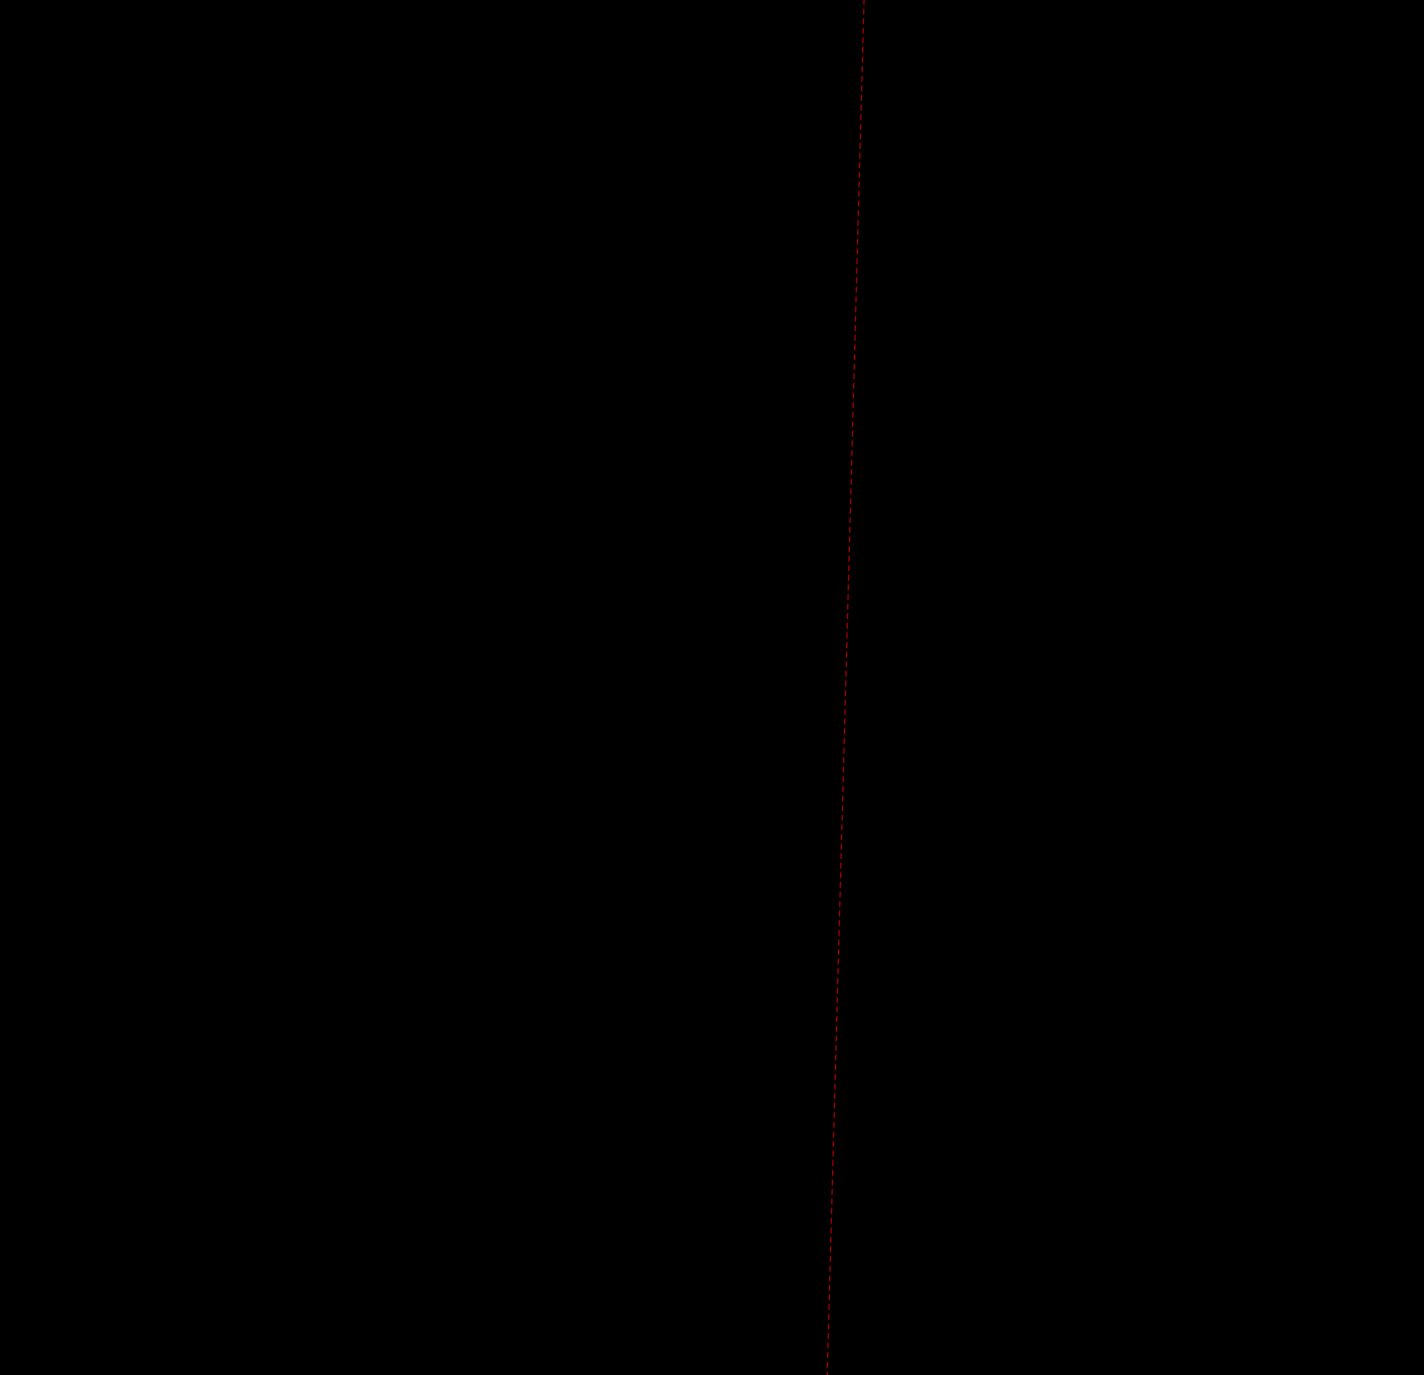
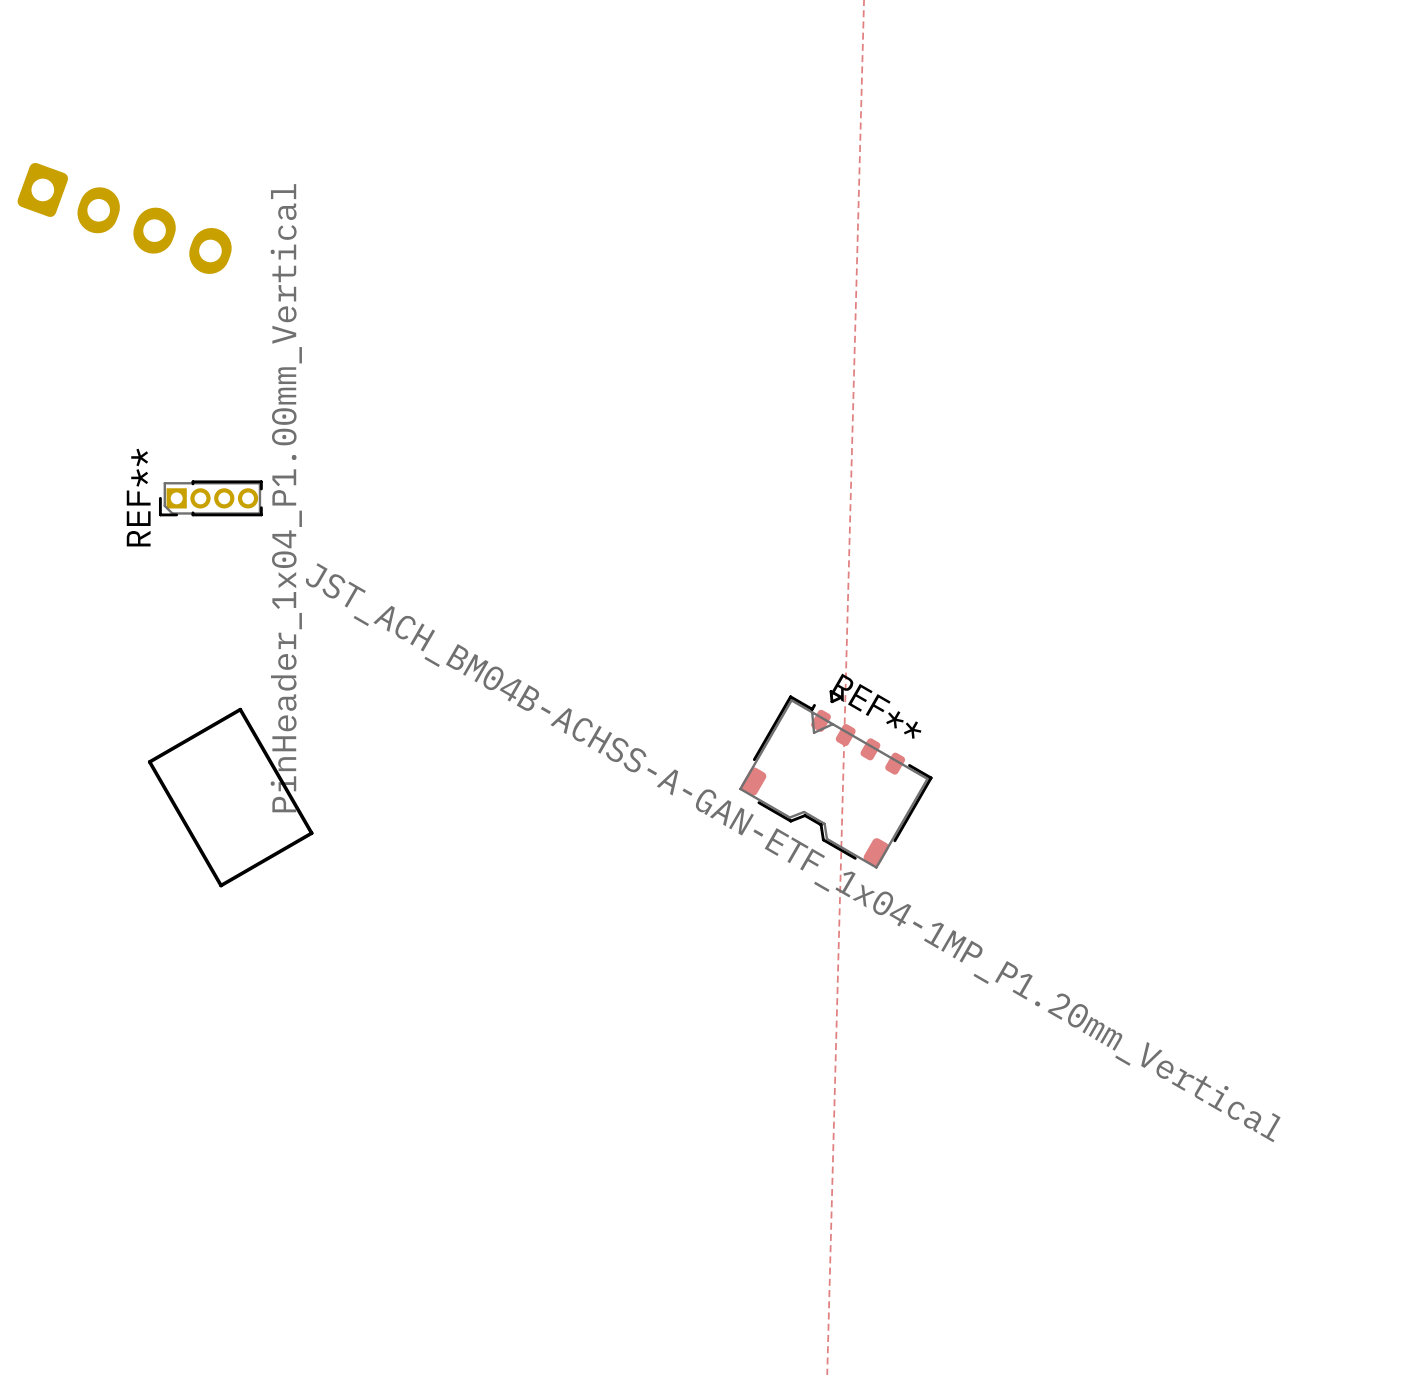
part: none -> (124, 218)
REF**: none -> PinHeader_1x04_P1.00mm_Vertical (210, 498)
line: none -> (240, 709) (149, 761) (221, 885) (311, 833) (240, 709)
REF**: none -> JST_ACH_BM04B-ACHSS-A-GAN-ETF_1x04-1MP_P1.20mm_Vertical (835, 779)

